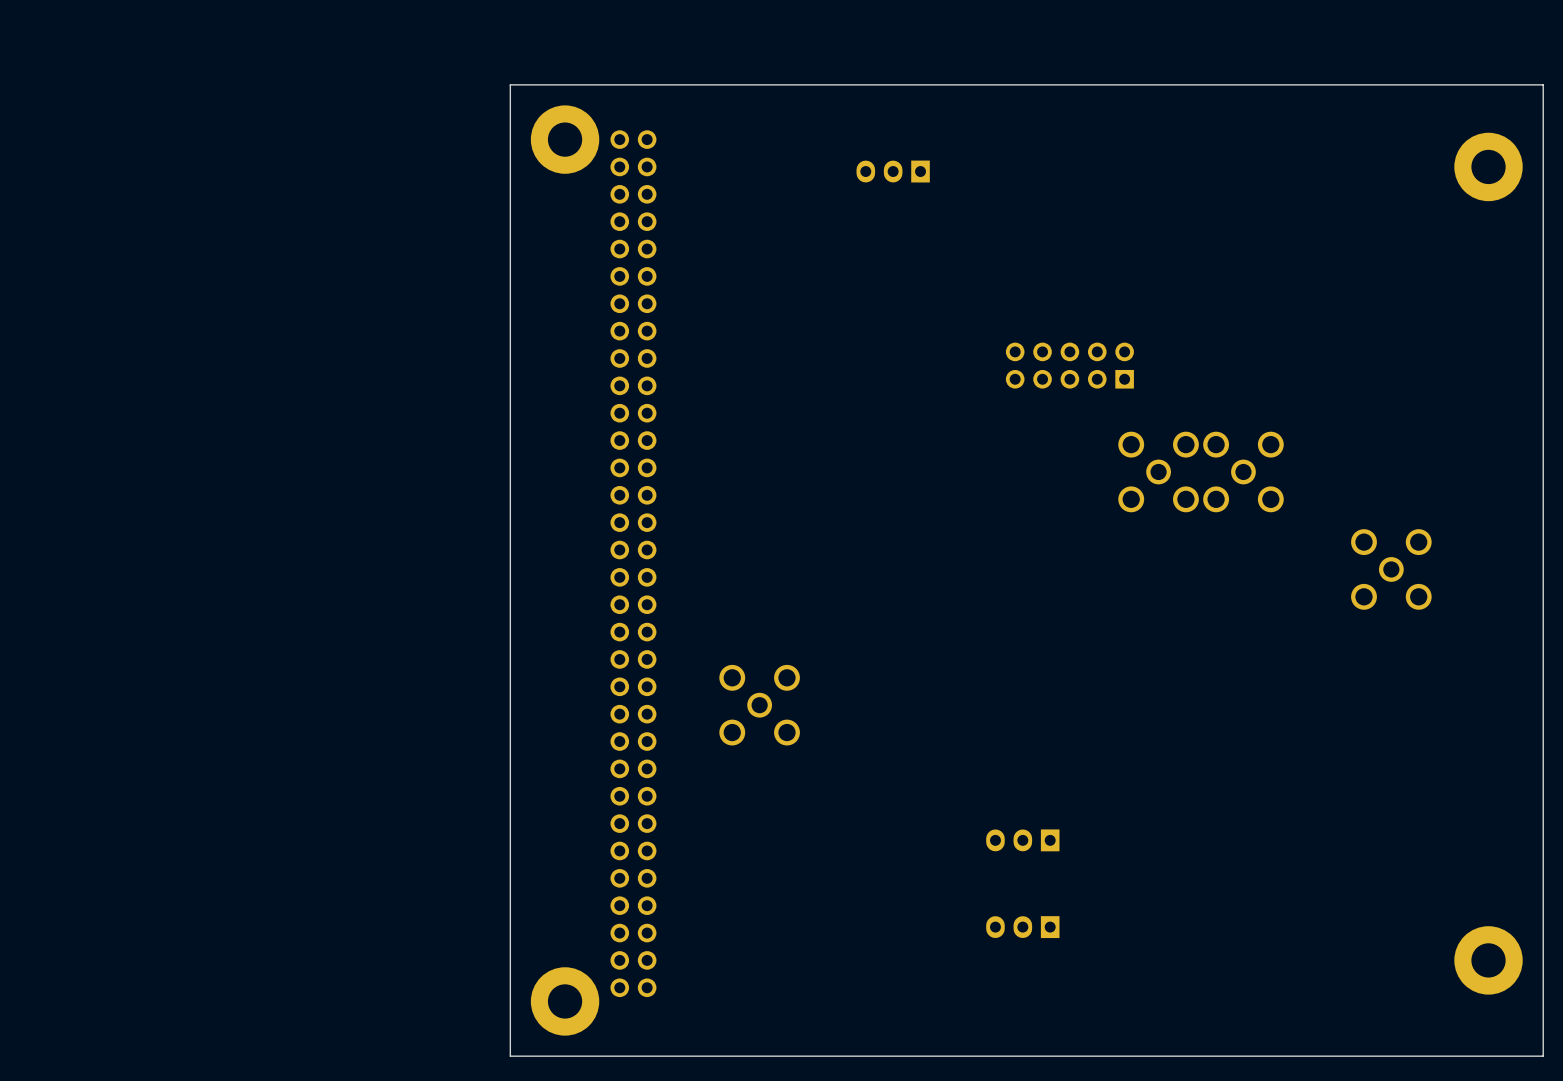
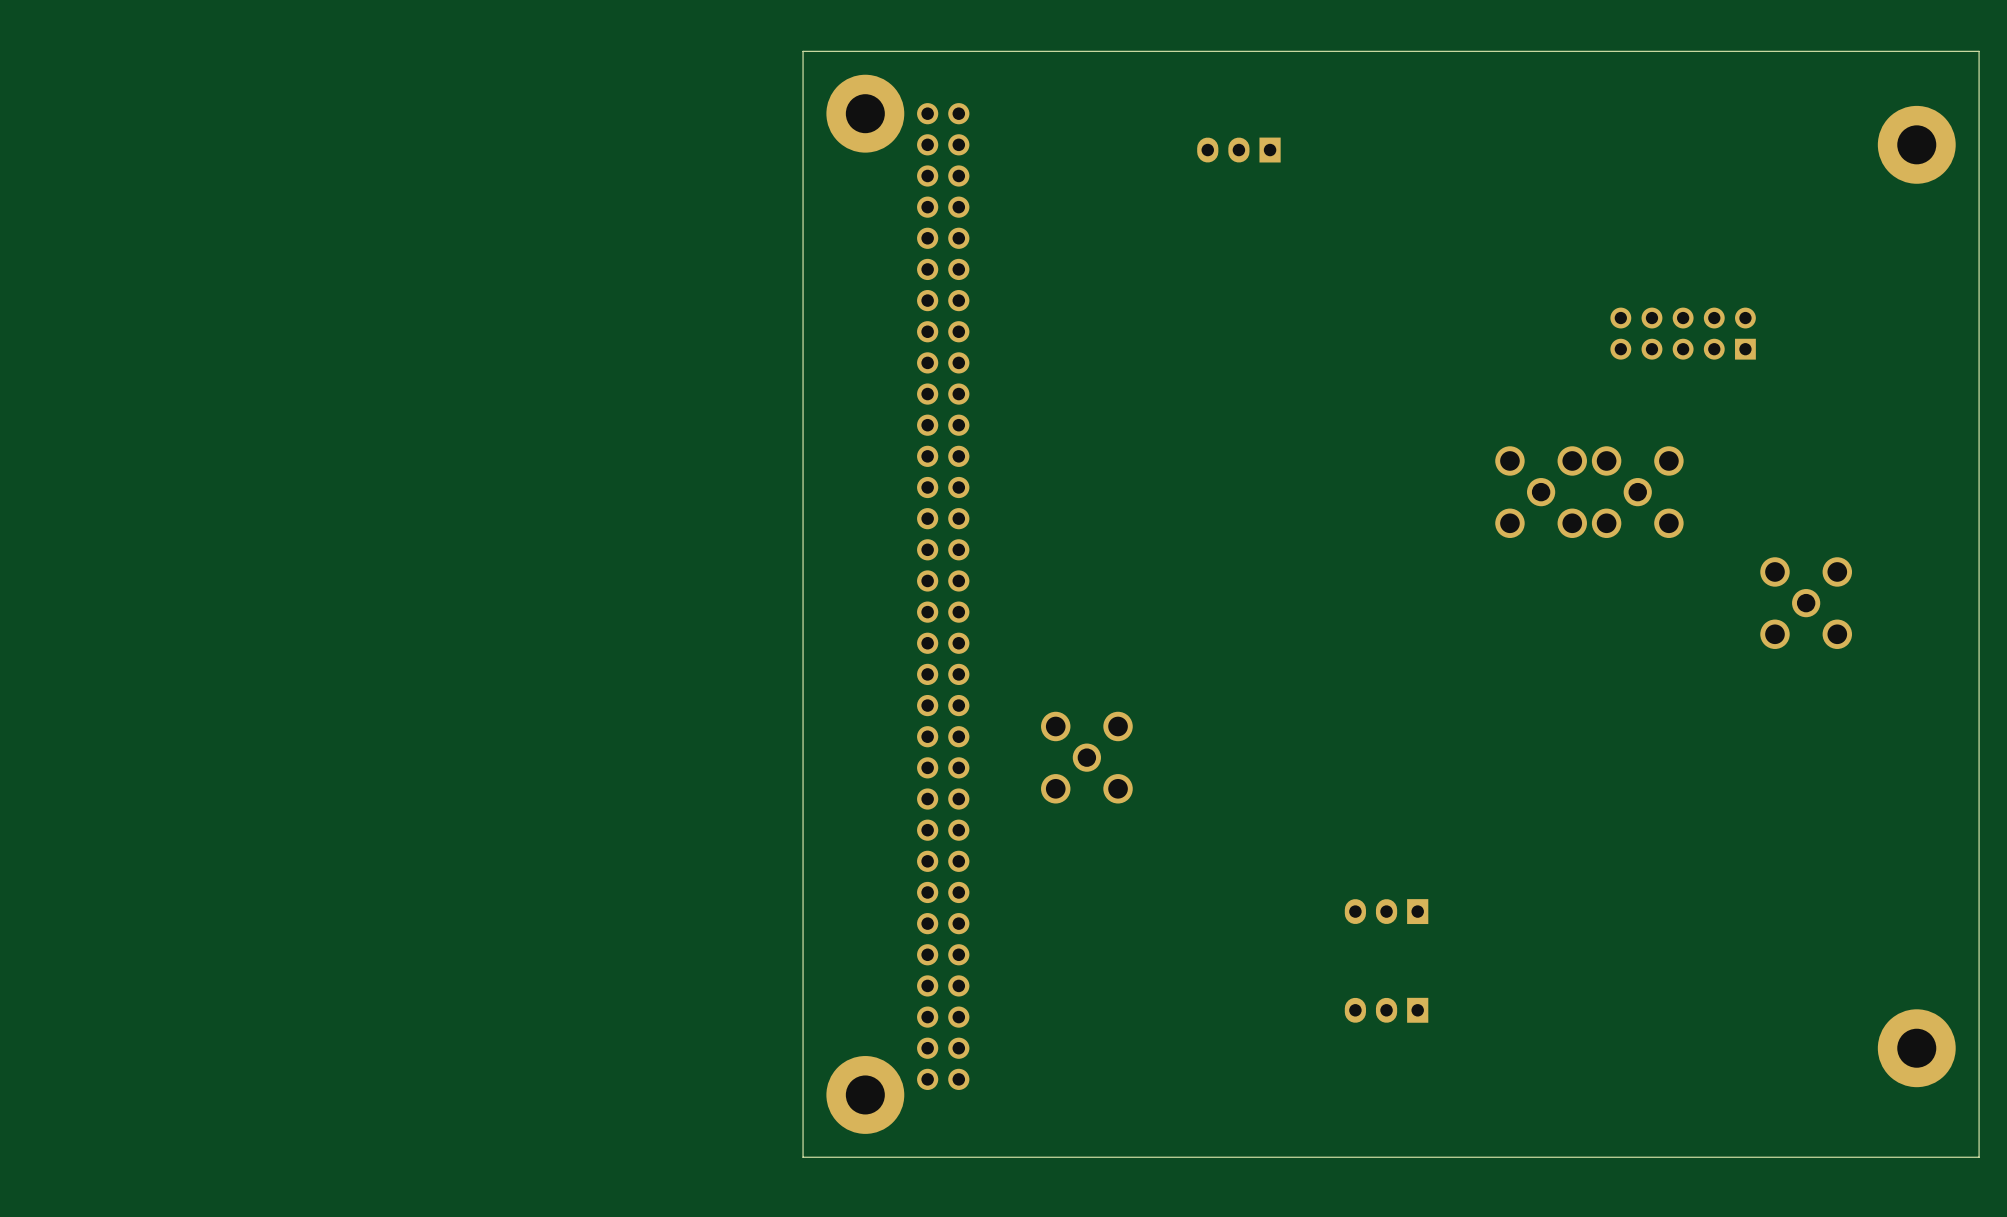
part: none -> (1683, 333)
part: (1069, 365) -> none

